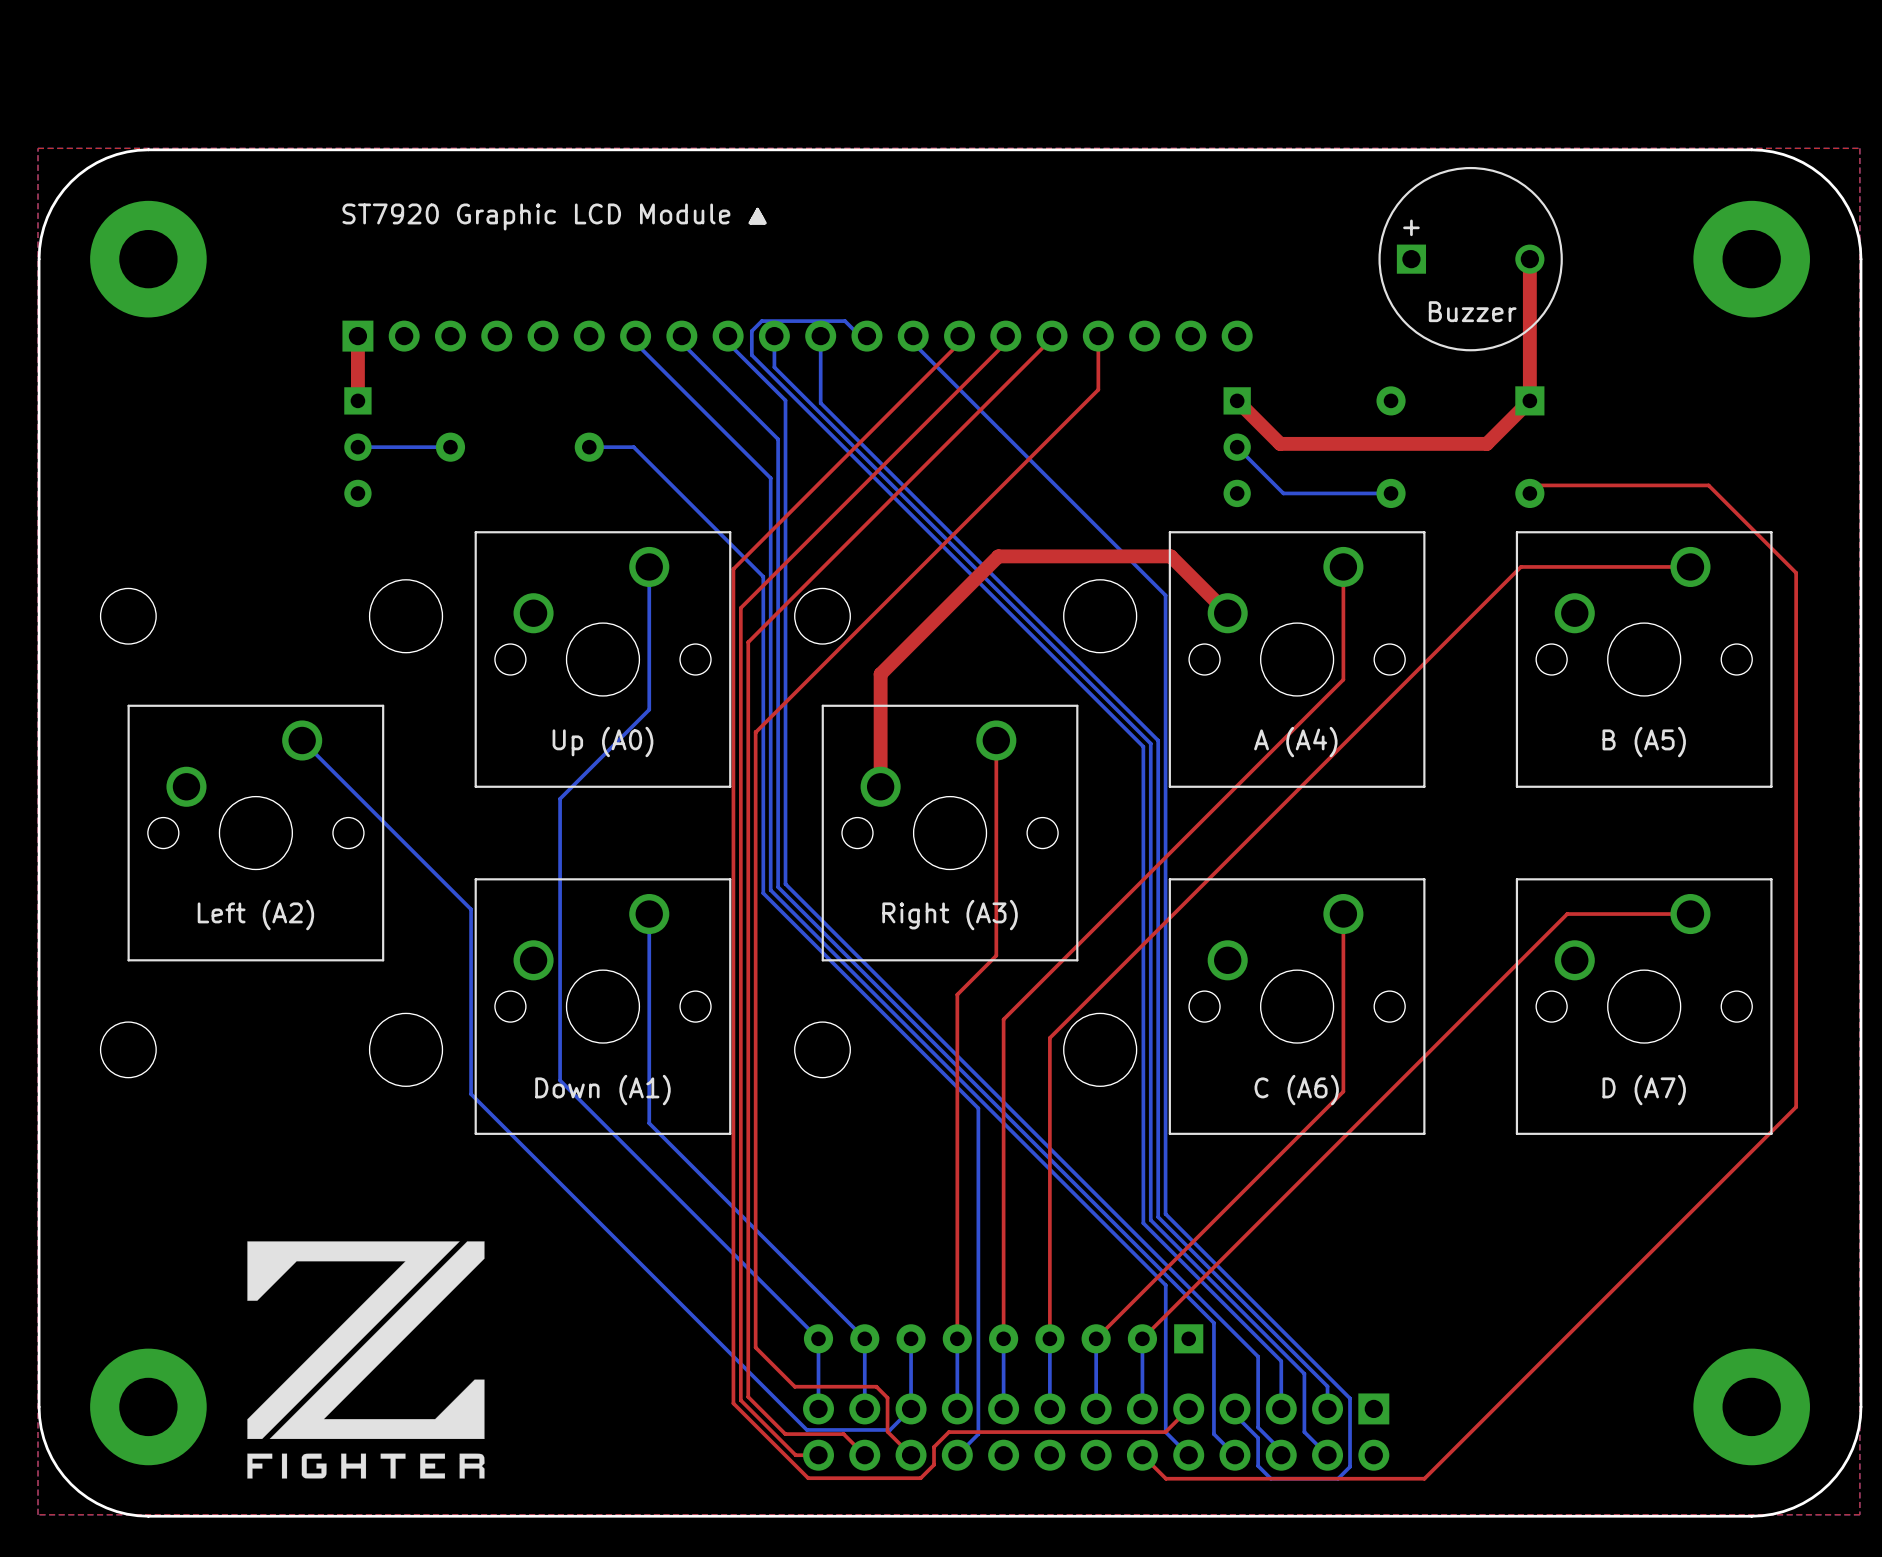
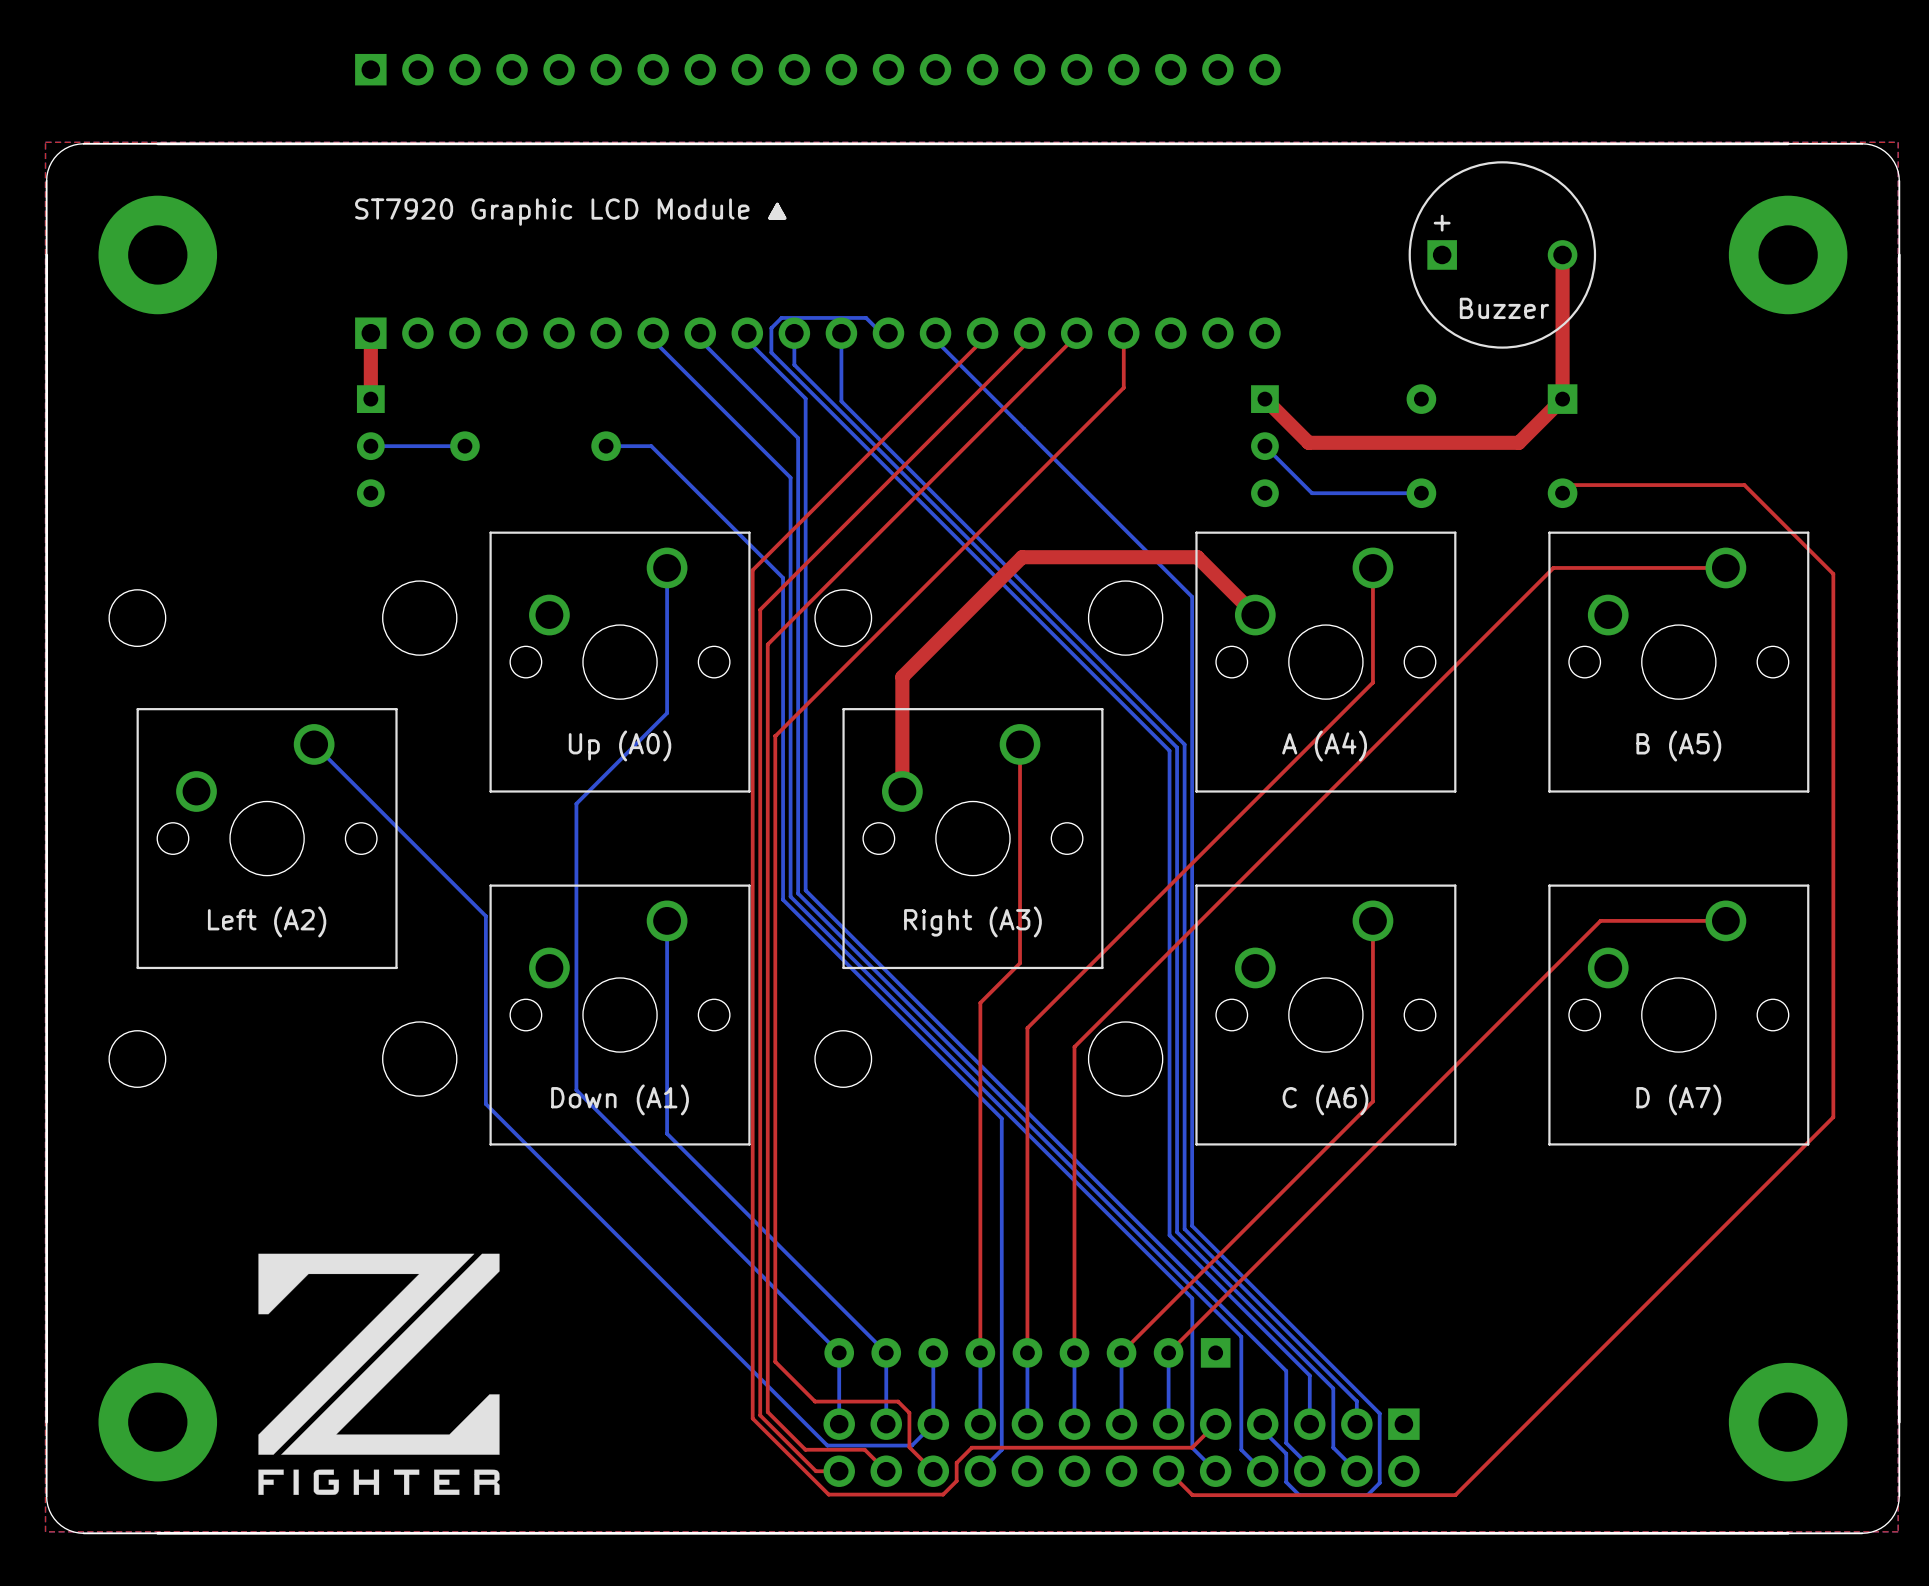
part: none -> (817, 69)
board edge: (148, 149) (127, 151) (106, 158) (87, 168) (71, 181) (57, 198) (47, 217) (41, 237) (39, 259) -> (157, 143) (78, 144) (65, 148) (57, 154) (51, 162) (46, 176) (46, 254)
board edge: (1751, 149) (1773, 151) (1793, 158) (1812, 168) (1828, 181) (1842, 198) (1852, 217) (1858, 237) (1860, 259) -> (1788, 143) (1867, 144) (1880, 148) (1888, 154) (1896, 166) (1898, 176) (1899, 254)
board edge: (39, 1406) (41, 1428) (47, 1448) (57, 1467) (71, 1484) (87, 1497) (106, 1507) (127, 1514) (148, 1516) -> (46, 1422) (46, 1501) (51, 1514) (57, 1522) (69, 1530) (78, 1532) (157, 1533)
board edge: (1860, 1406) (1858, 1428) (1852, 1448) (1842, 1467) (1828, 1484) (1812, 1497) (1793, 1507) (1773, 1514) (1751, 1516) -> (1899, 1422) (1898, 1501) (1896, 1510) (1888, 1522) (1876, 1530) (1867, 1532) (1788, 1533)

